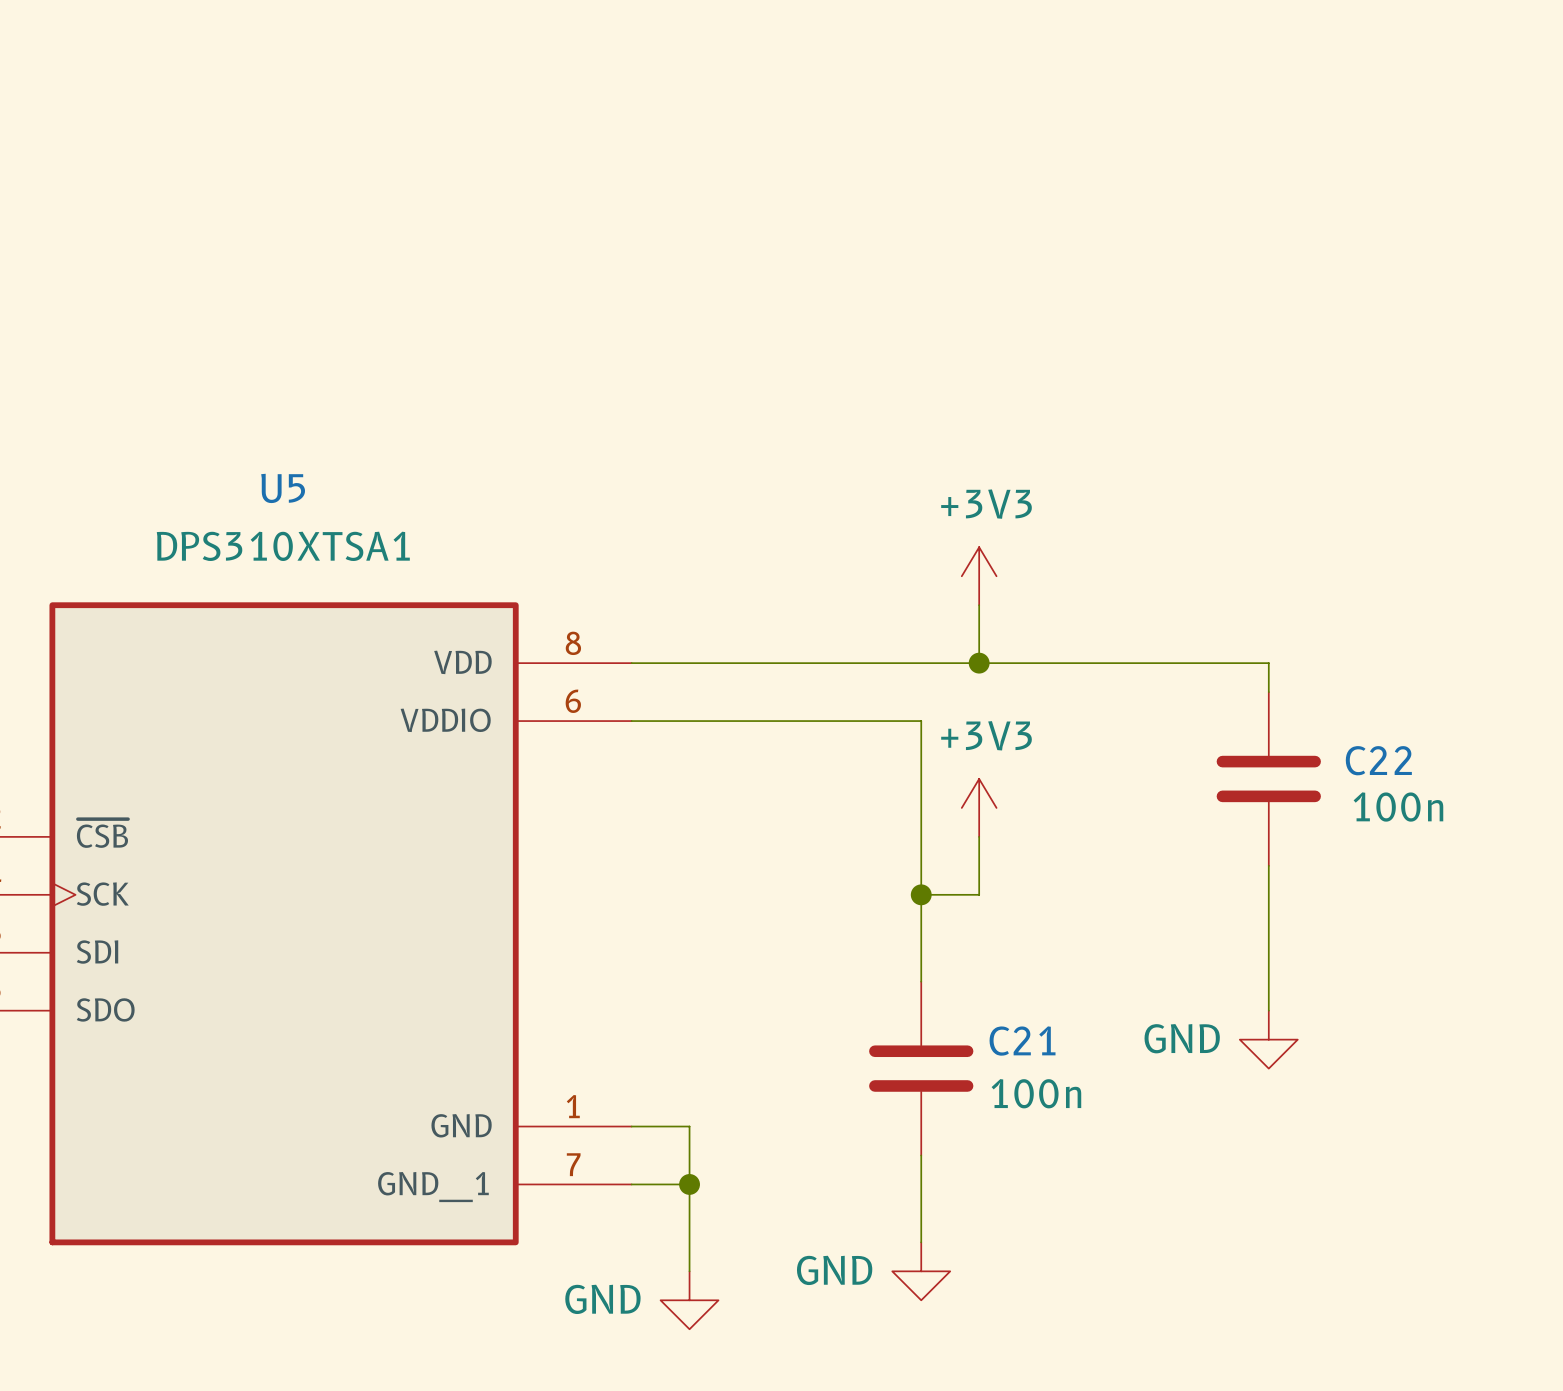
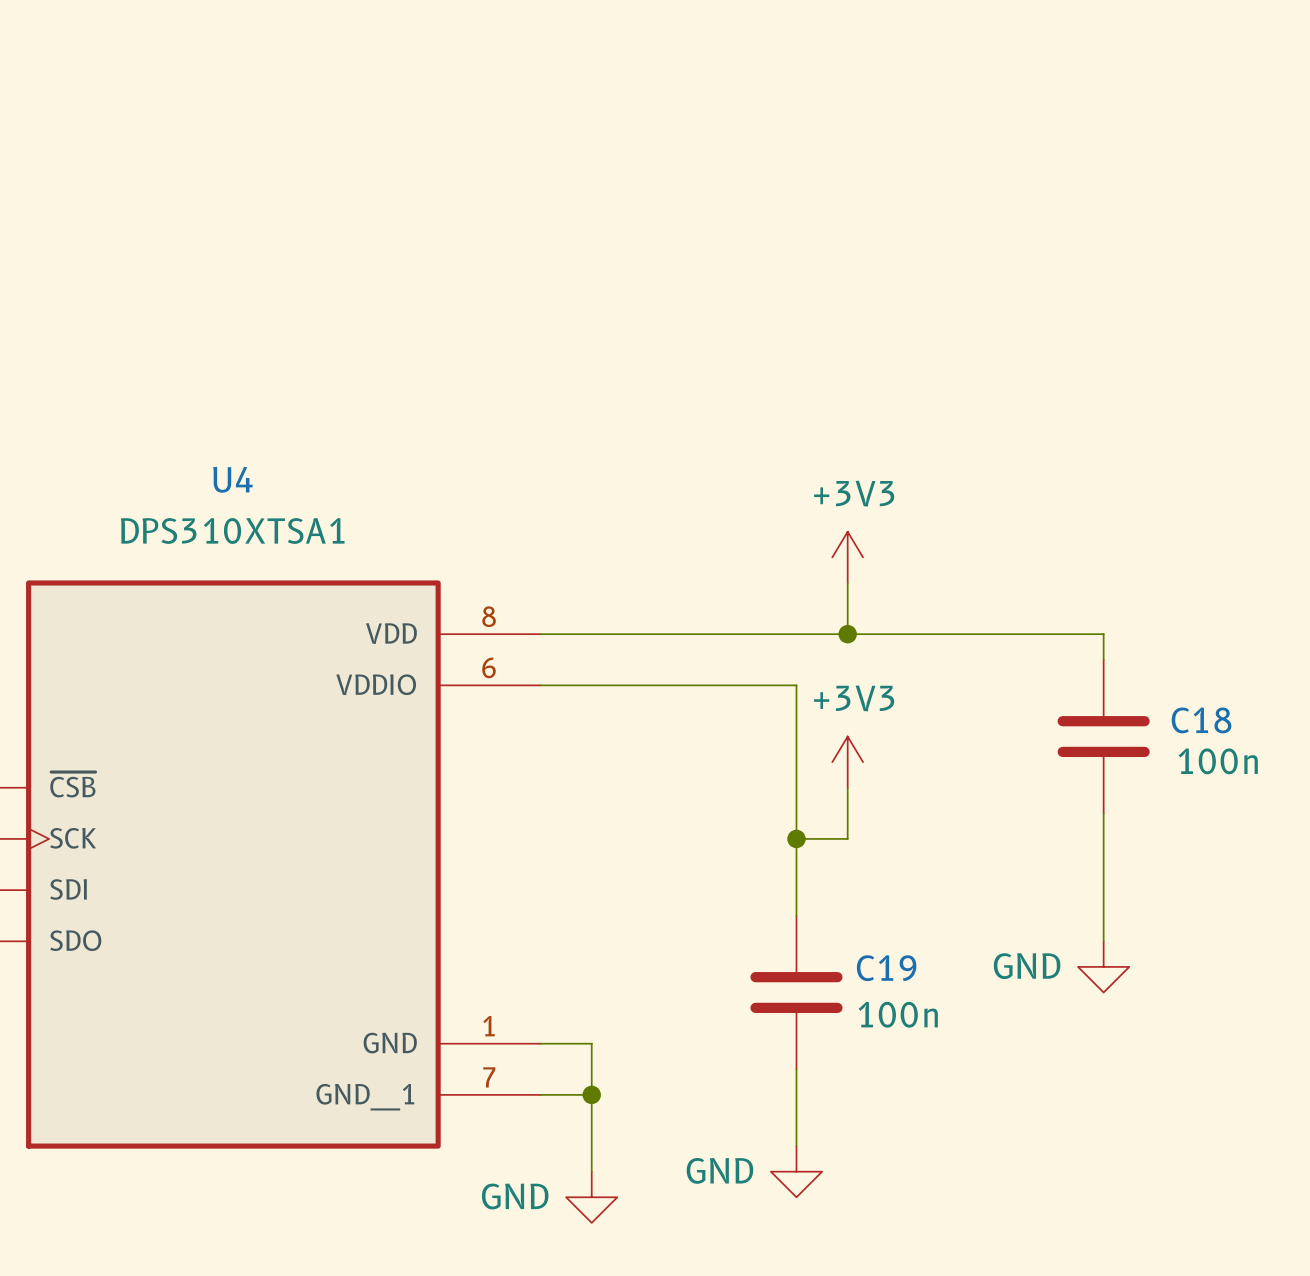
U5 name: U5 (283, 488) -> U4 (232, 479)
C22 name: C22 (1378, 760) -> C18 (1201, 720)
C21 name: C21 (1022, 1041) -> C19 (886, 968)

